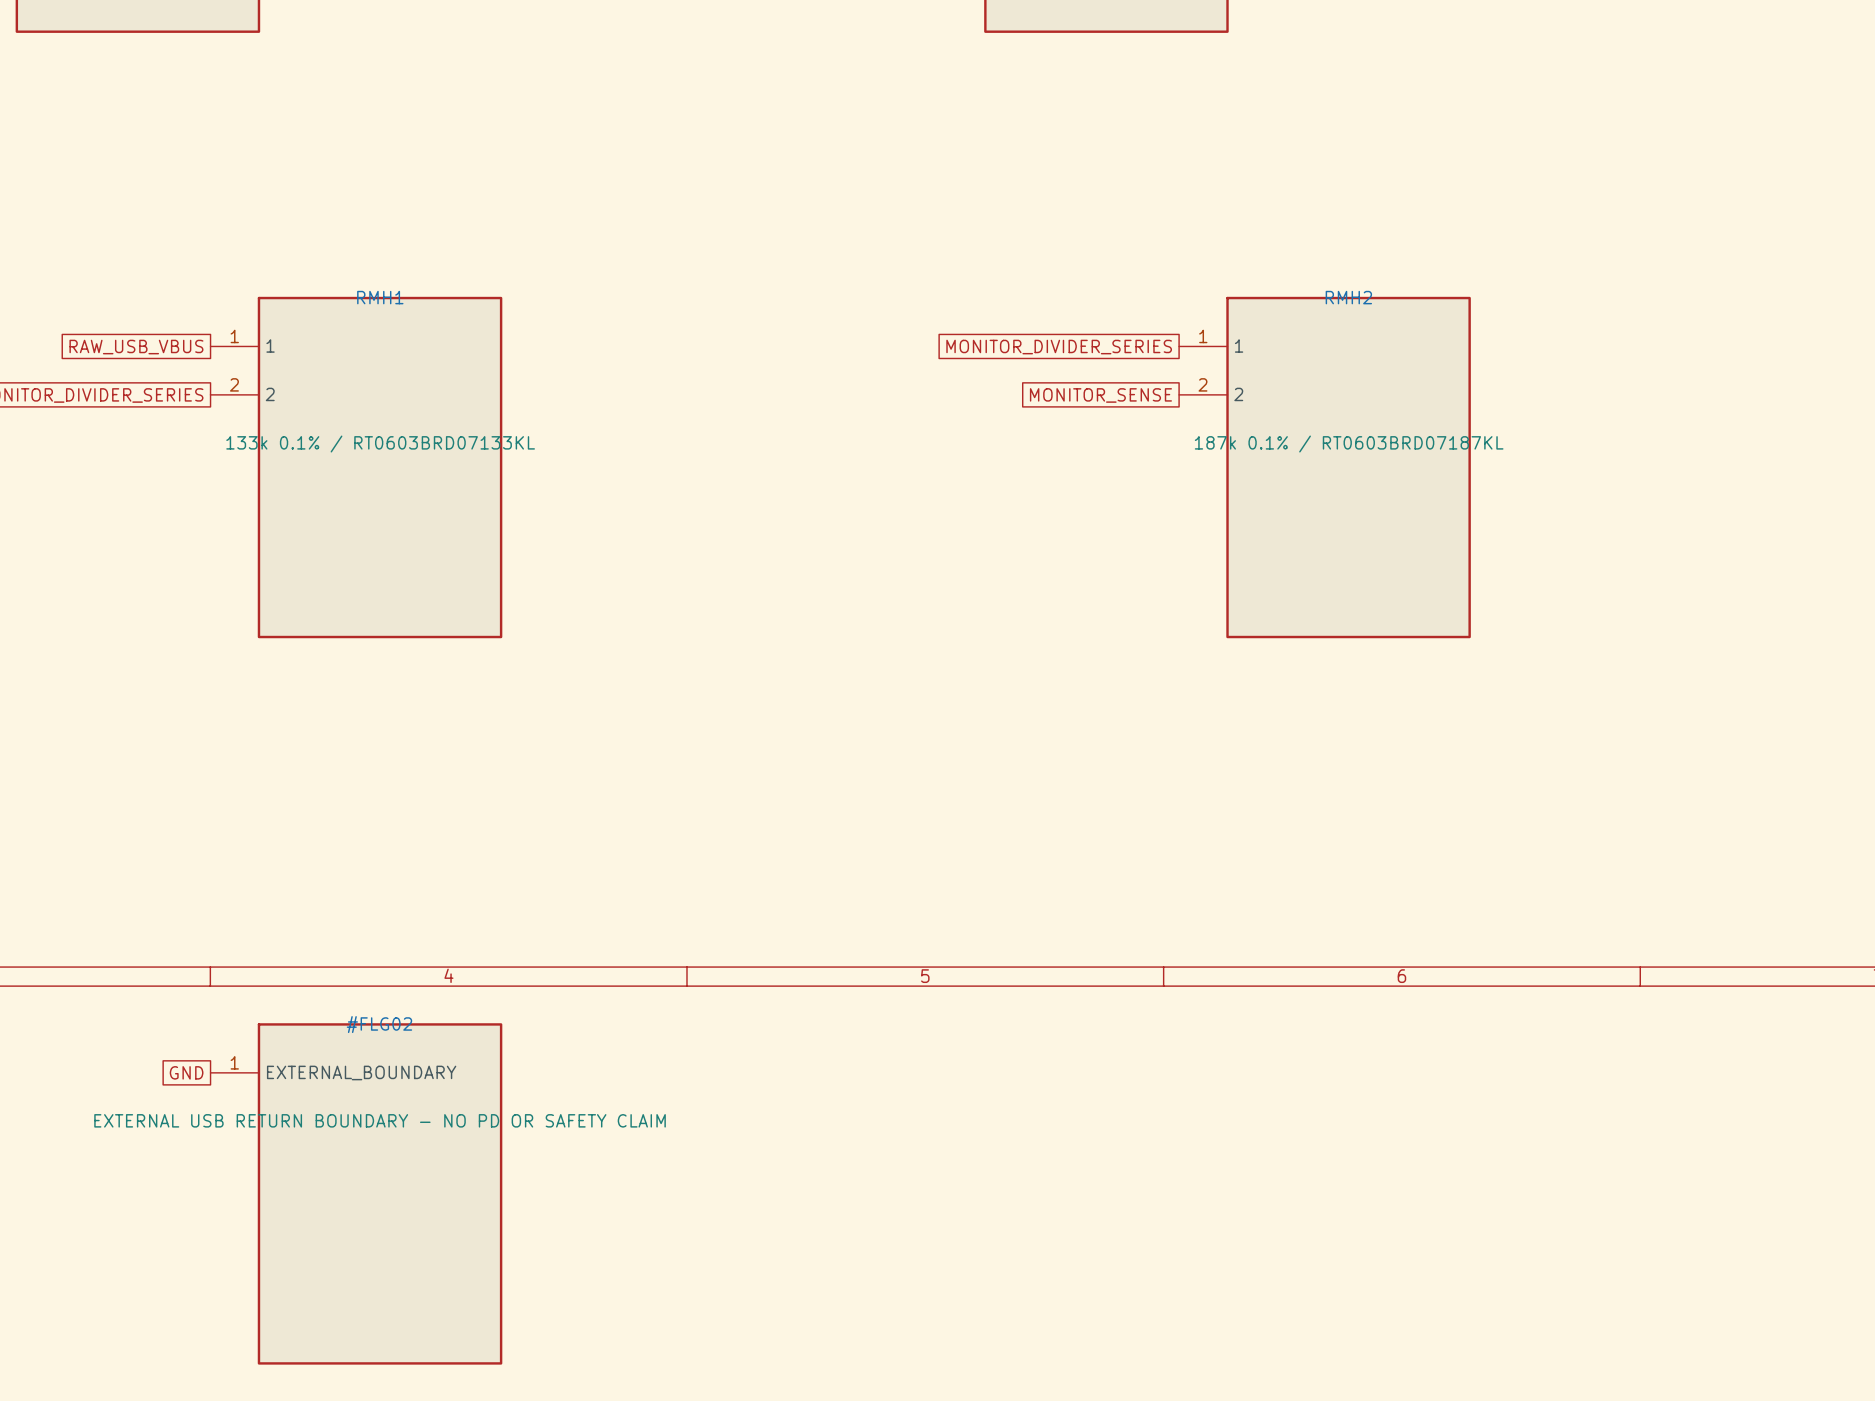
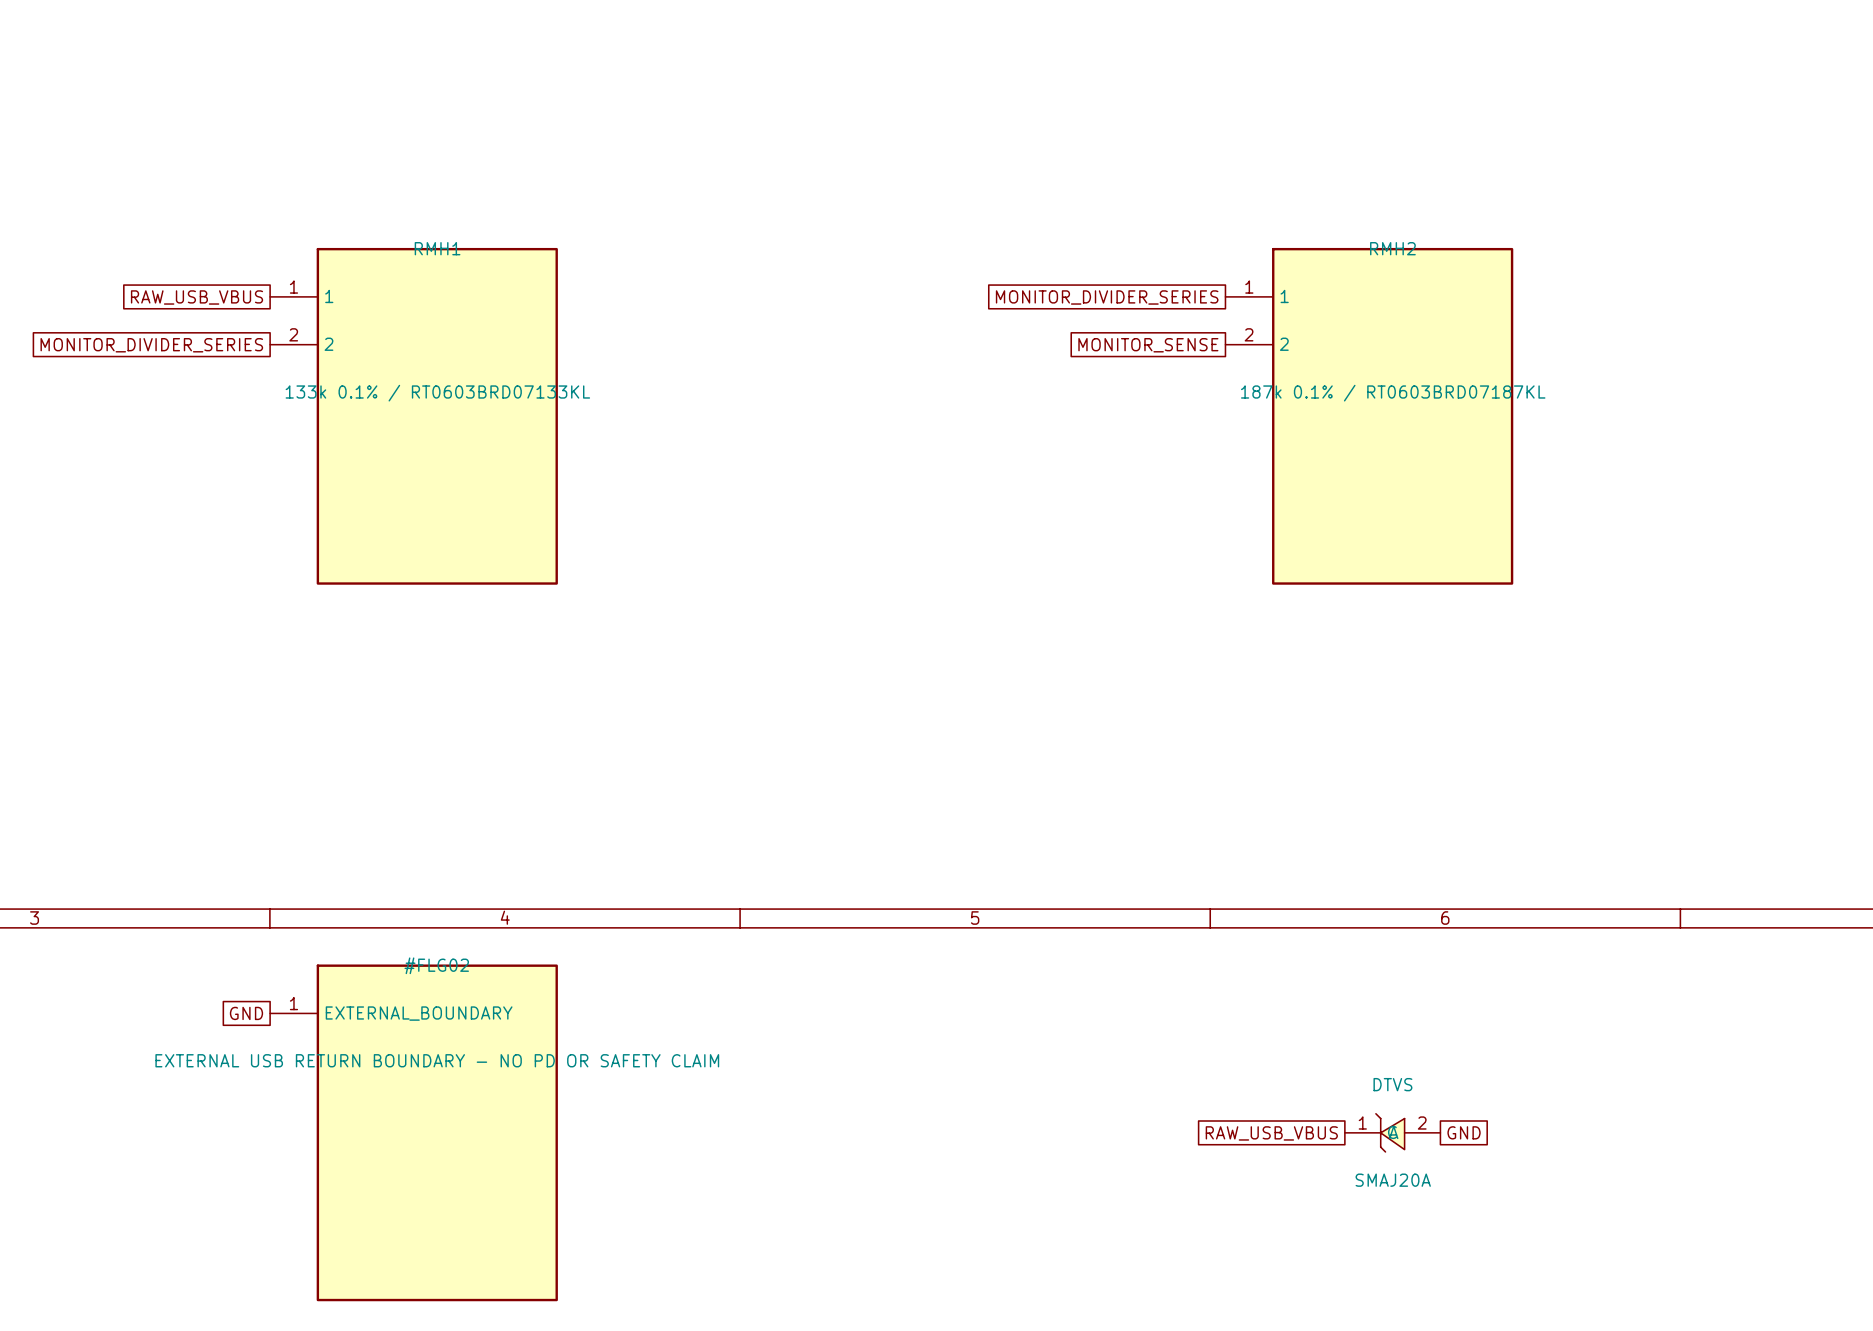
DTVS: none -> SMAJ20A (1392, 1132)
global label: none -> GND (1464, 1132)
global label: none -> RAW_USB_VBUS (1271, 1133)

